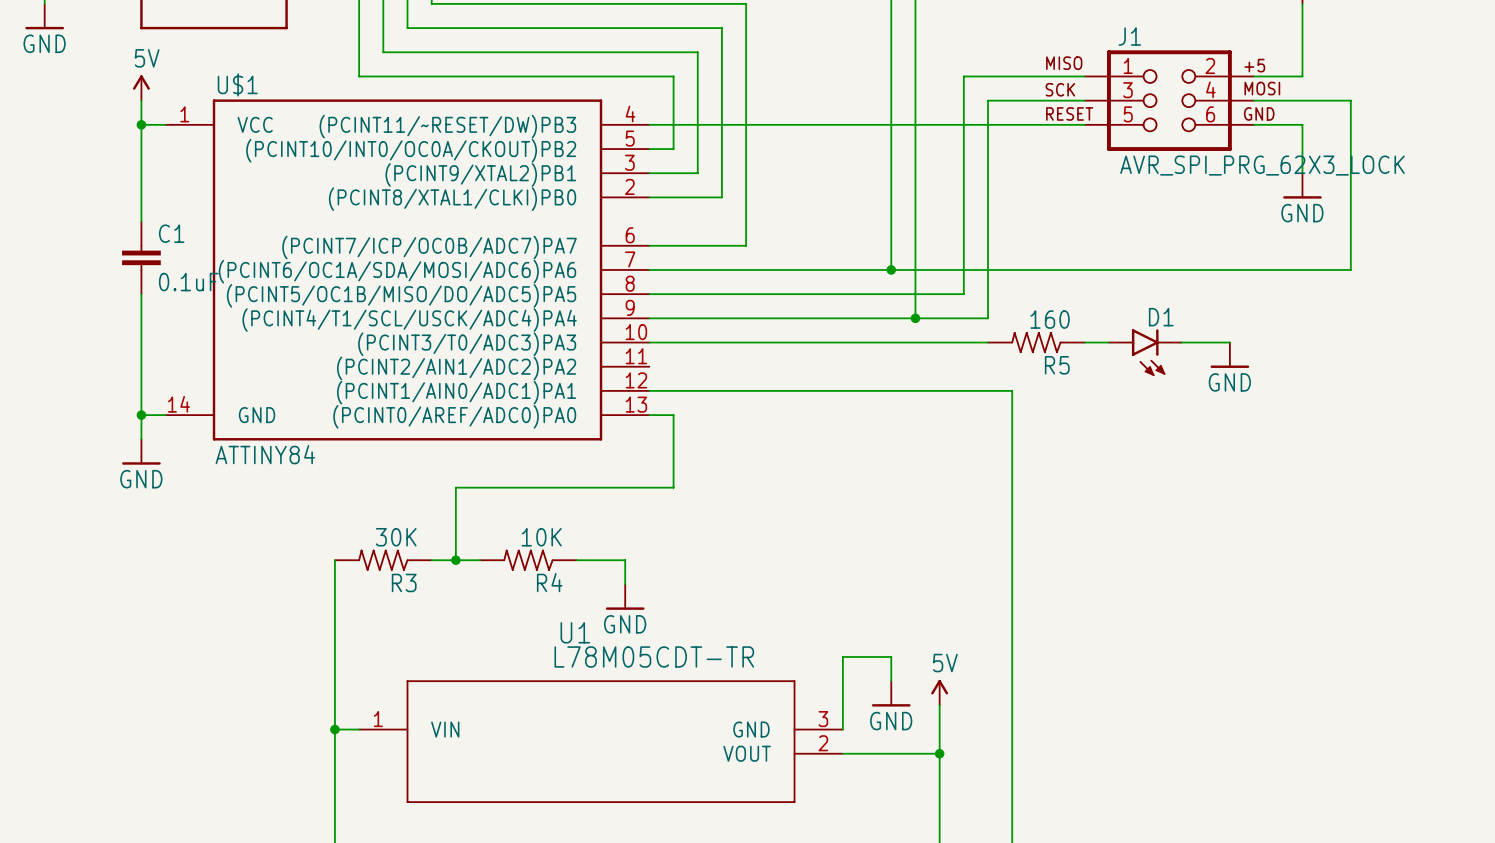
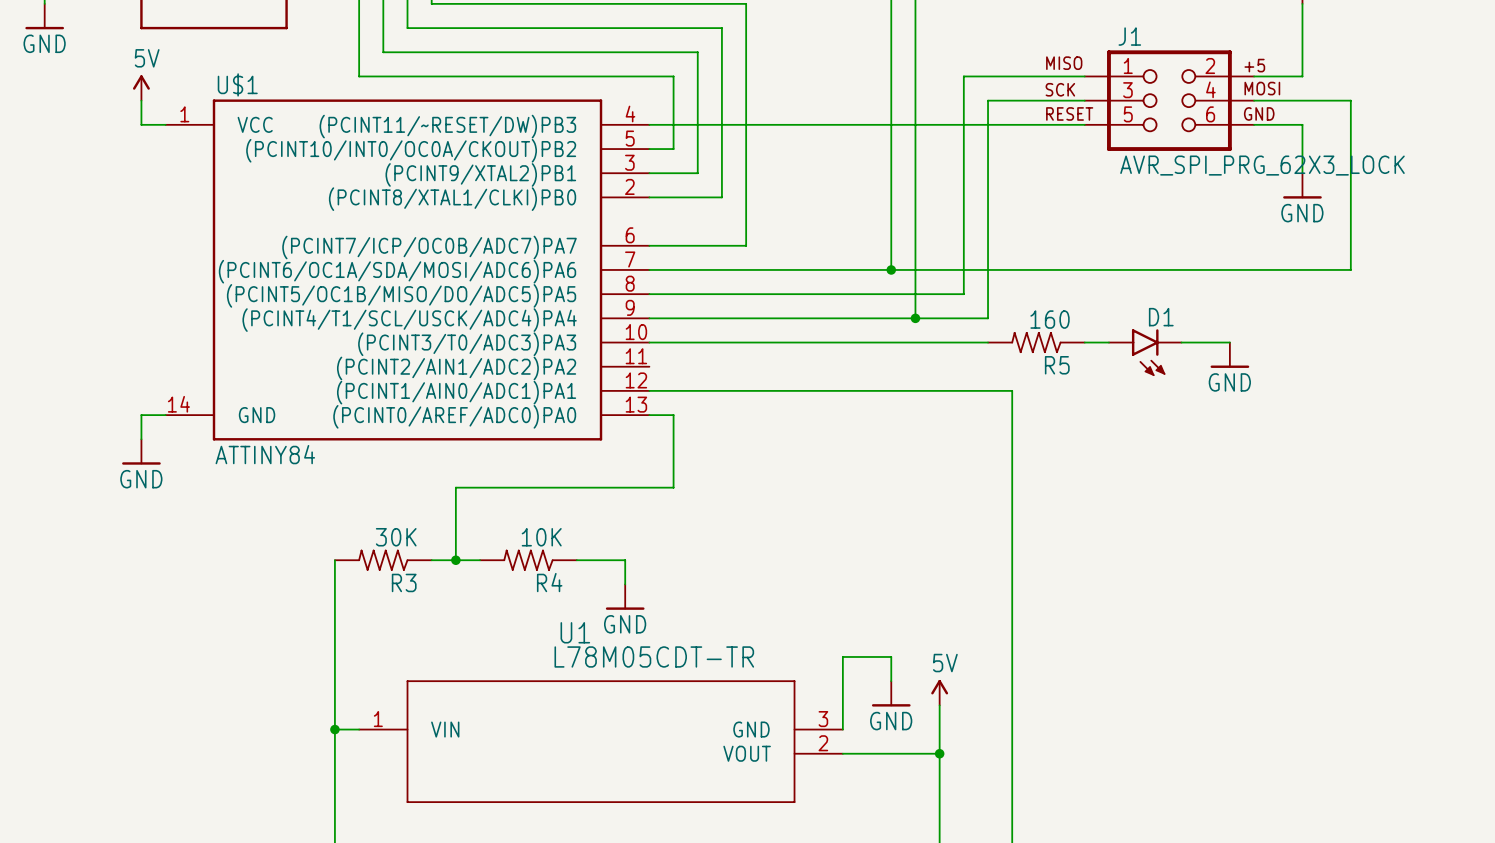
wire: (141, 124) (141, 221) -> none
junction: (141, 124) -> none
C1: 0.1uF (141, 257) -> none
wire: (141, 294) (141, 415) -> none
junction: (141, 415) -> none

